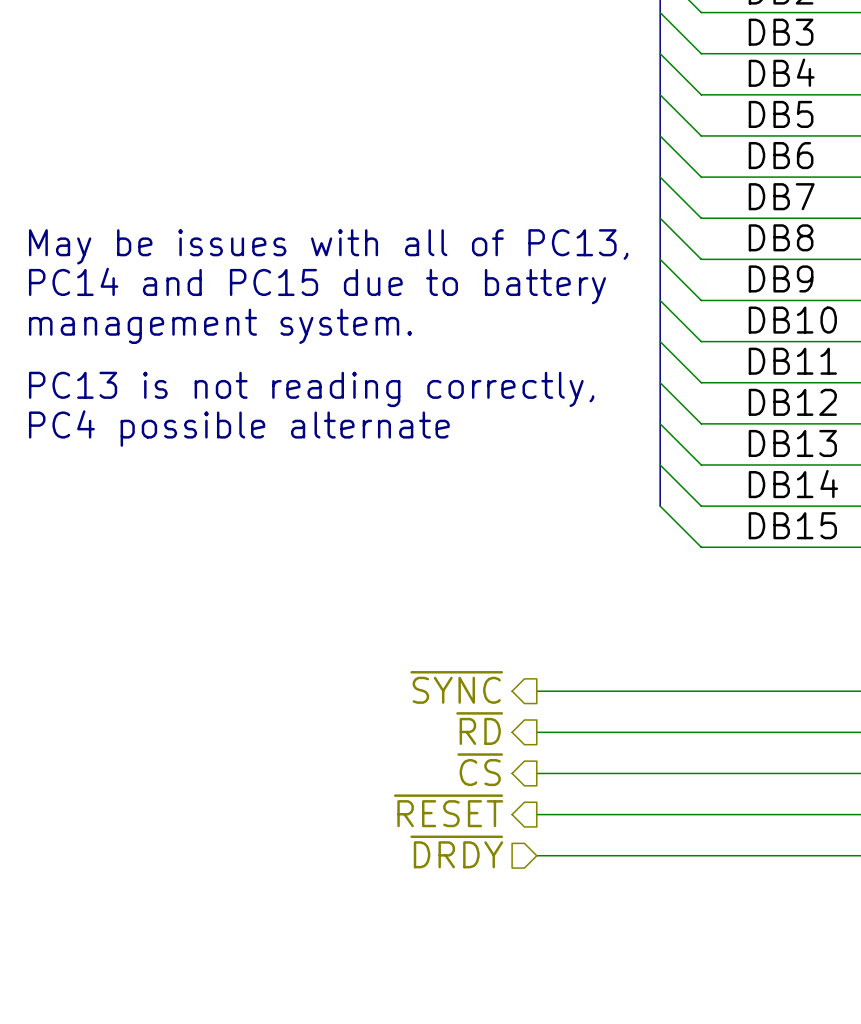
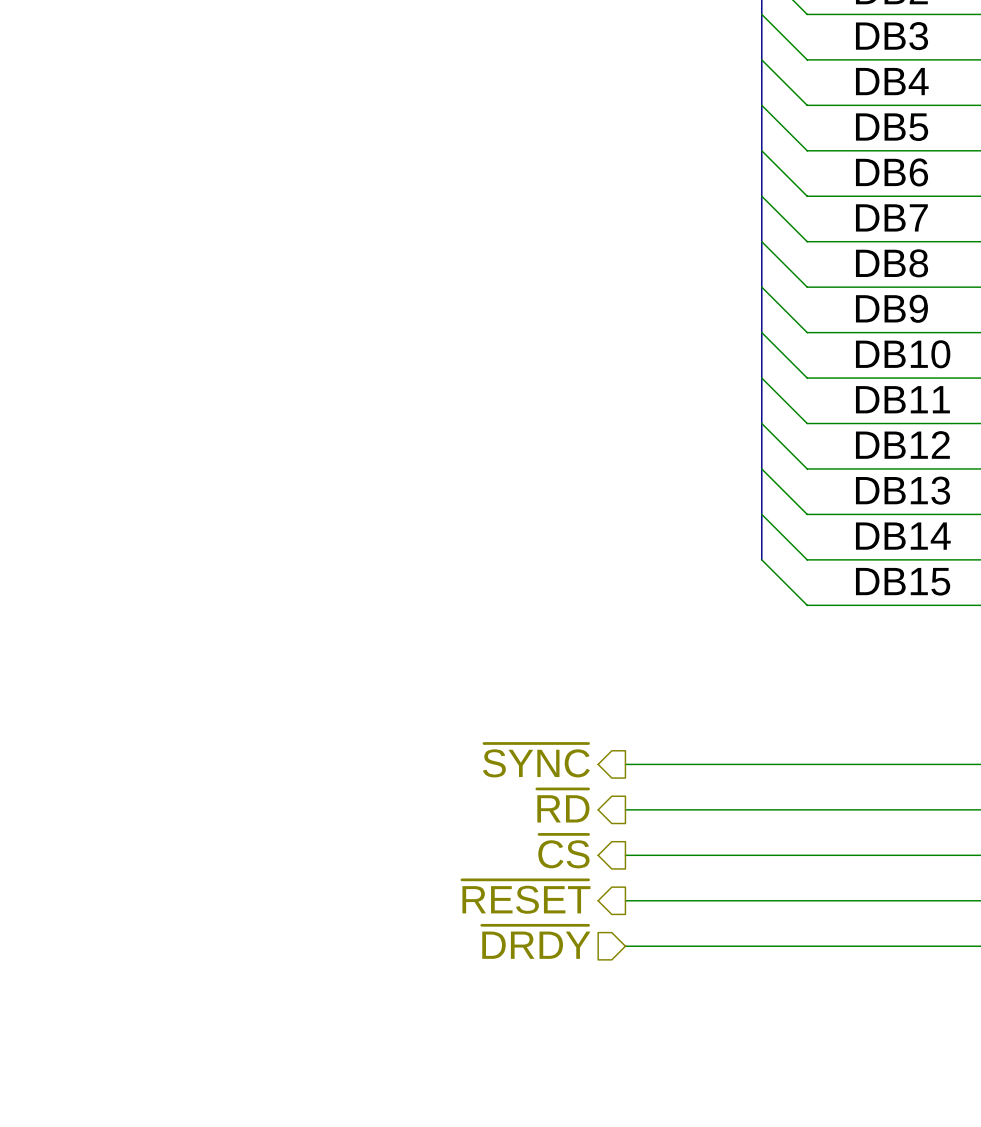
text: May be issues with all of PC13, (328, 246) -> none
text: PC14 and PC15 due to battery (317, 286) -> none
text: management system. (220, 326) -> none
text: PC13 is not reading correctly, (311, 389) -> none
text: PC4 possible alternate (239, 428) -> none

